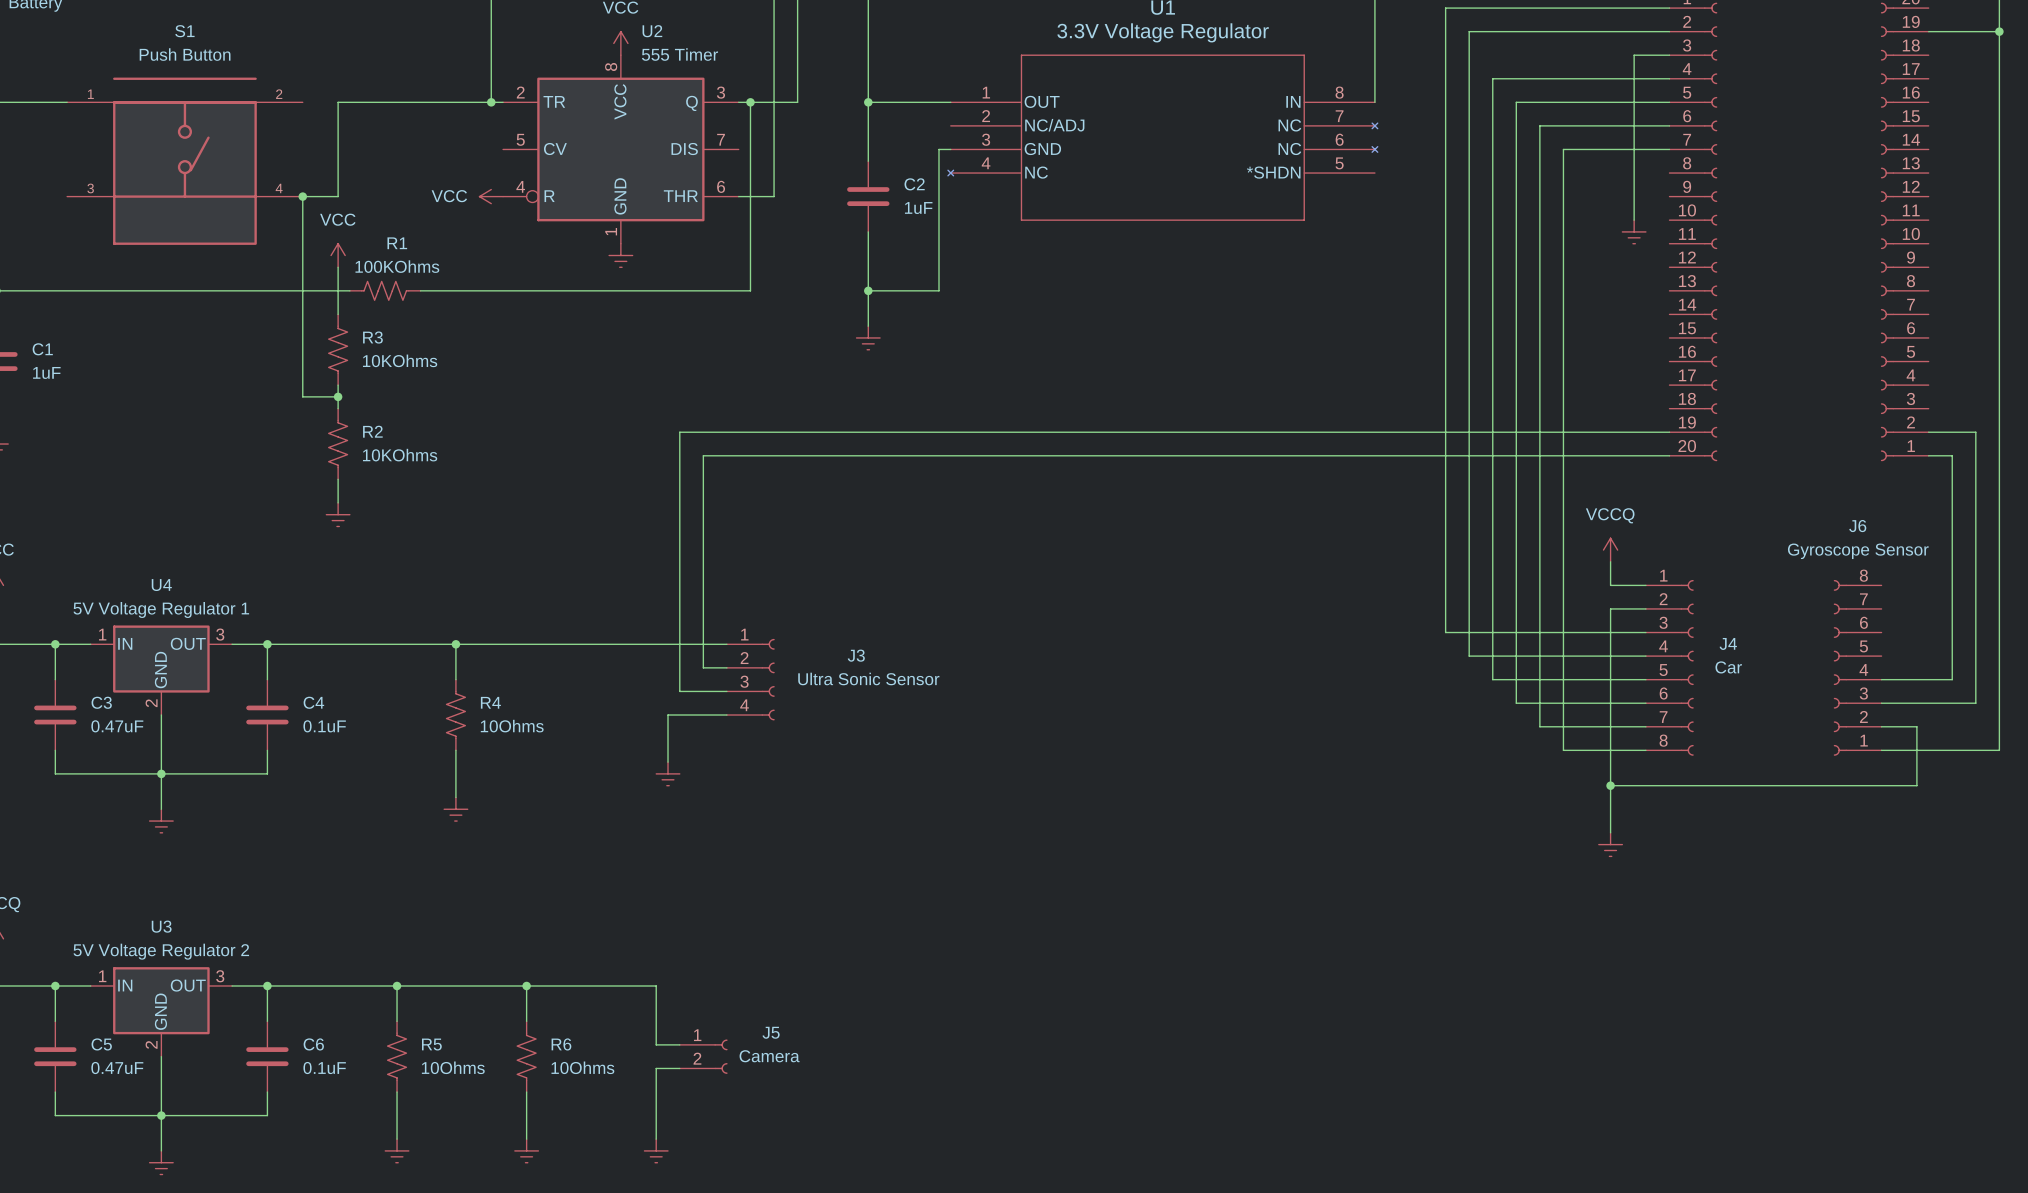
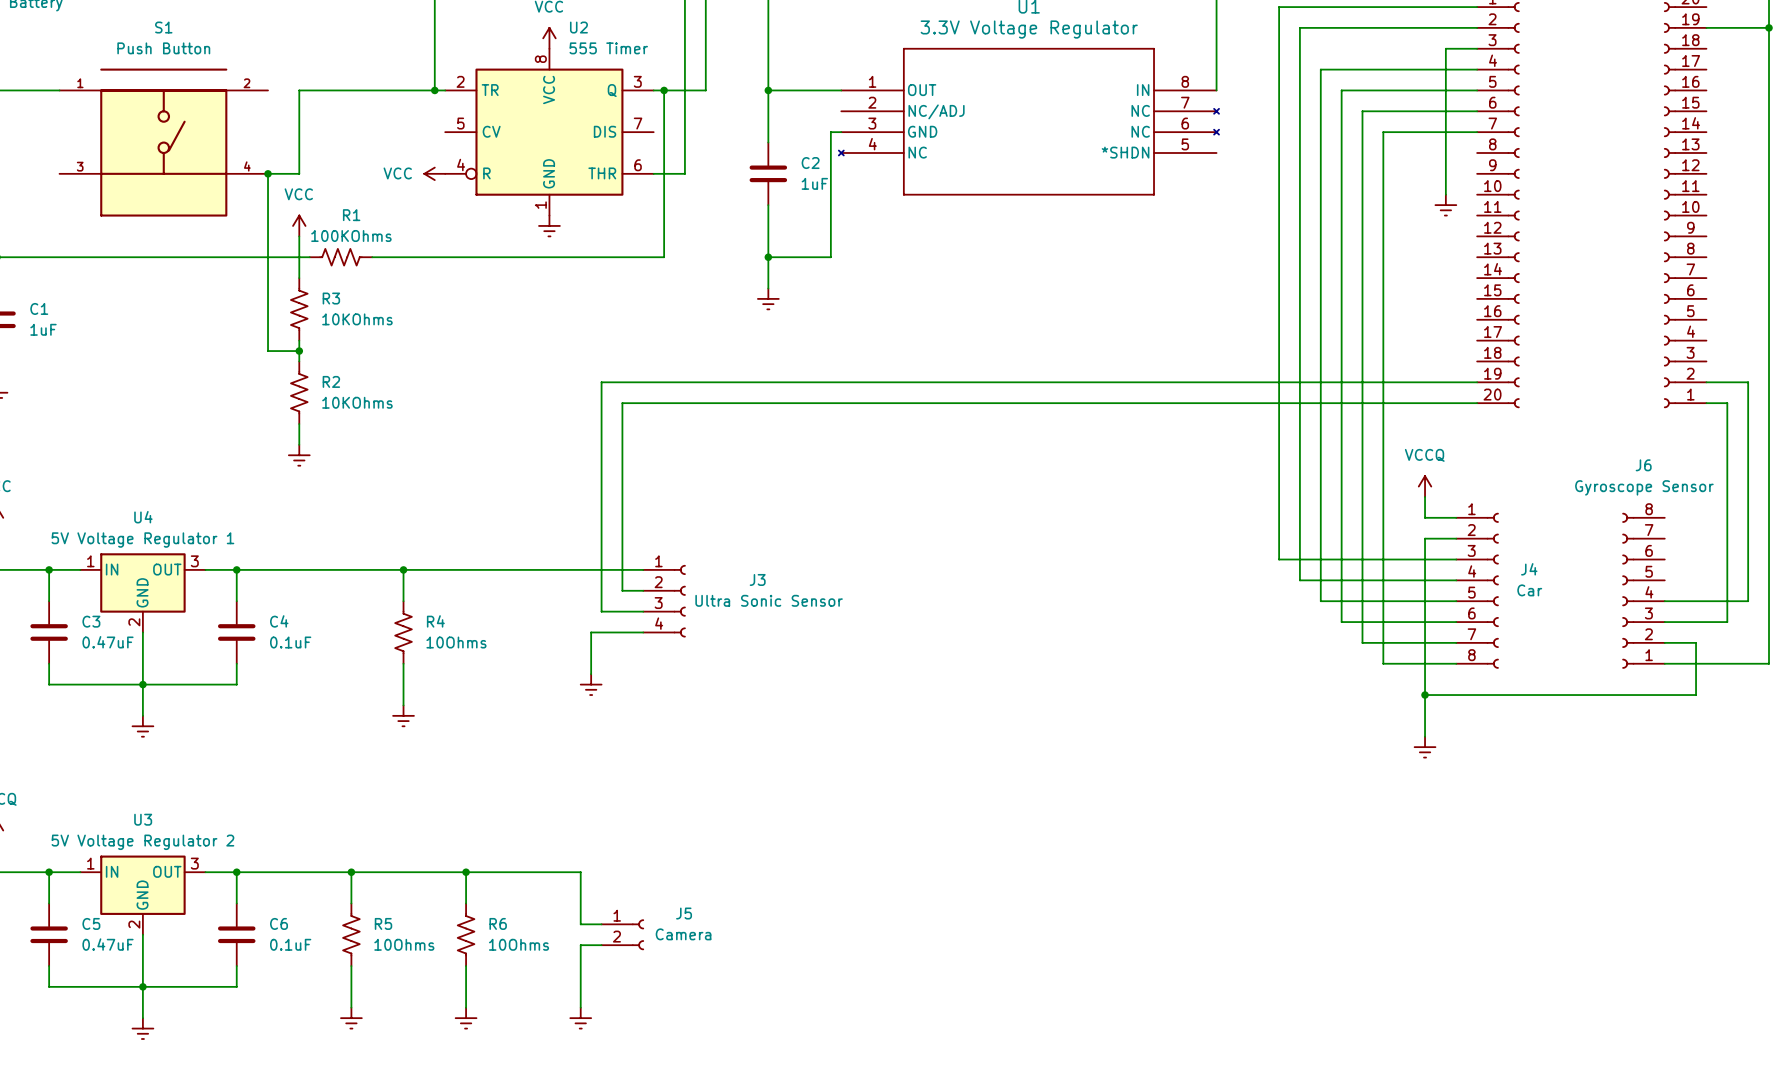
wire: (1975, 679) (1975, 703) (1952, 703) -> (1748, 601) (1727, 601) (1727, 622)

